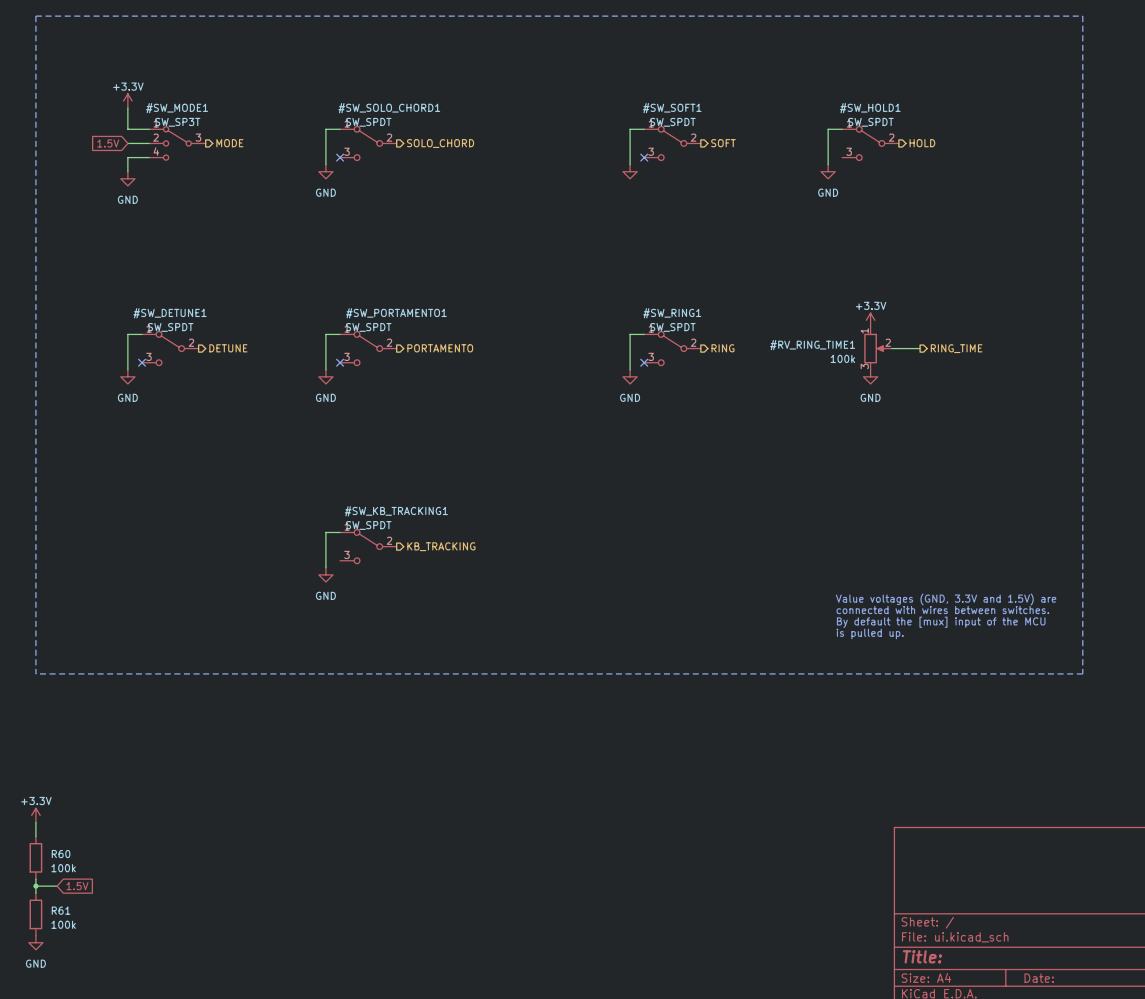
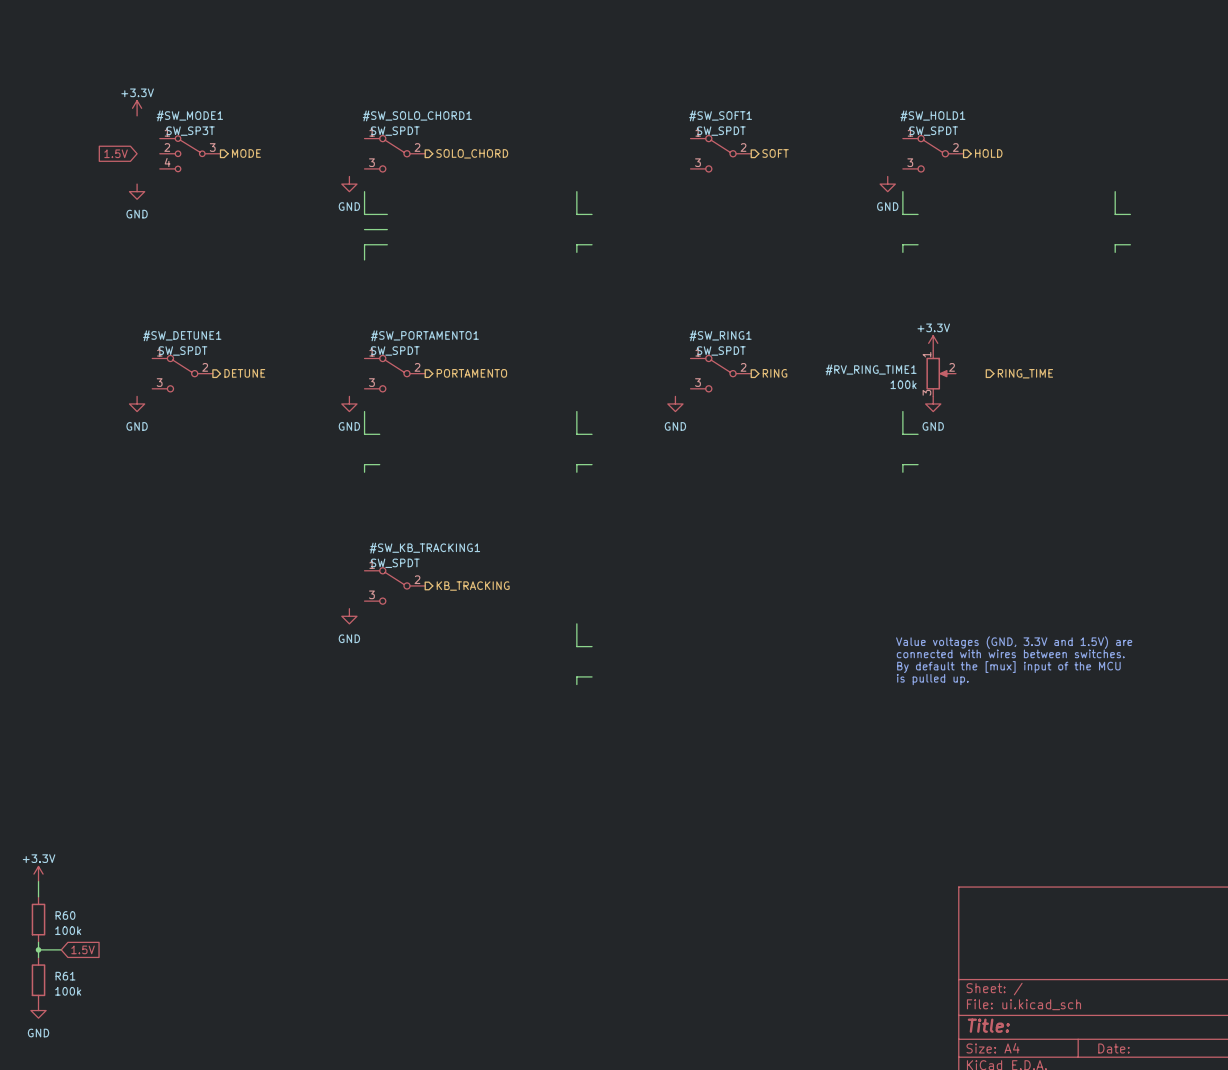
line: (35, 16) (35, 673) (1082, 673) (1082, 16) (35, 16) -> none
wire: (127, 108) (127, 129) (149, 129) -> none
wire: (340, 129) (325, 129) (325, 164) -> none
wire: (644, 129) (630, 129) (630, 164) -> none
wire: (842, 129) (828, 129) (828, 164) -> none
wire: (127, 143) (149, 143) -> none
wire: (149, 157) (127, 157) (127, 171) -> none
no-connect mark: (340, 157) -> none
no-connect mark: (644, 157) -> none
power symbol: (630, 171) -> none
wire: none -> (364, 191) (364, 214) (387, 214)
wire: none -> (576, 191) (576, 214) (592, 214)
wire: none -> (902, 191) (902, 214) (918, 214)
wire: none -> (1115, 191) (1115, 214) (1130, 214)
wire: none -> (364, 229) (387, 229)
wire: none -> (387, 244) (364, 244) (364, 259)
wire: none -> (592, 244) (576, 244) (576, 252)
wire: none -> (918, 244) (902, 244) (902, 252)
wire: none -> (1130, 244) (1115, 244) (1115, 252)
wire: (142, 334) (127, 334) (127, 369) -> none
wire: (340, 334) (325, 334) (325, 369) -> none
wire: (644, 334) (630, 334) (630, 369) -> none
wire: (891, 348) (920, 348) -> none
no-connect mark: (142, 362) -> none
no-connect mark: (340, 362) -> none
no-connect mark: (644, 362) -> none
wire: none -> (364, 411) (364, 434) (379, 434)
wire: none -> (576, 411) (576, 434) (592, 434)
wire: none -> (902, 411) (902, 434) (918, 434)
wire: none -> (379, 464) (364, 464) (364, 472)
wire: none -> (592, 464) (576, 464) (576, 472)
wire: none -> (918, 464) (902, 464) (902, 472)
wire: (340, 532) (325, 532) (325, 567) -> none
wire: none -> (576, 623) (576, 646) (592, 646)
wire: none -> (592, 676) (576, 676) (576, 684)

